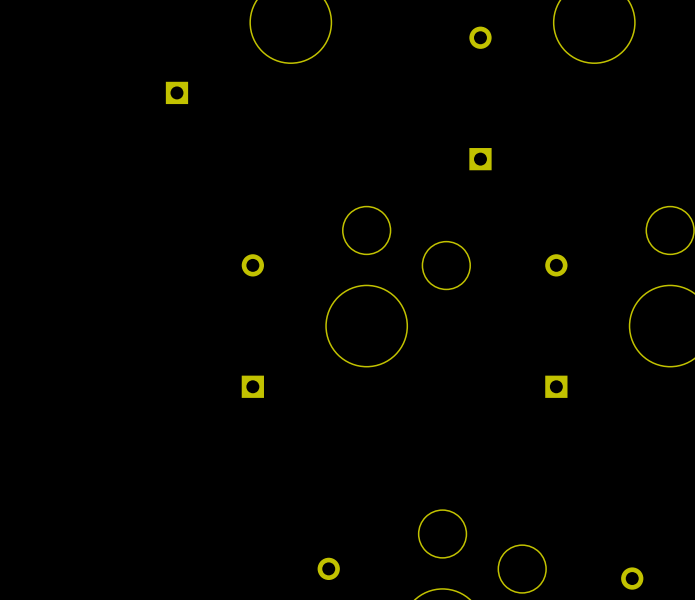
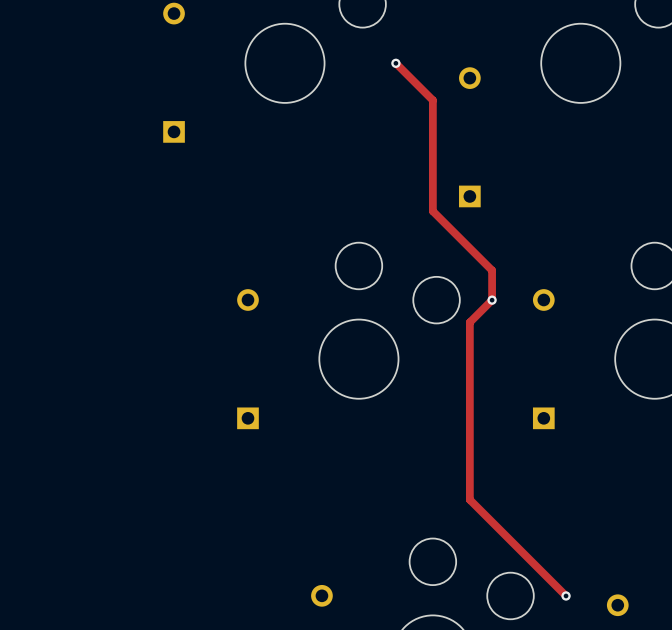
track: none -> (395, 63) (432, 100) (432, 211) (492, 270) (492, 300) (469, 322) (469, 499) (566, 595)
via: none -> (395, 63)
via: none -> (492, 300)
via: none -> (566, 595)

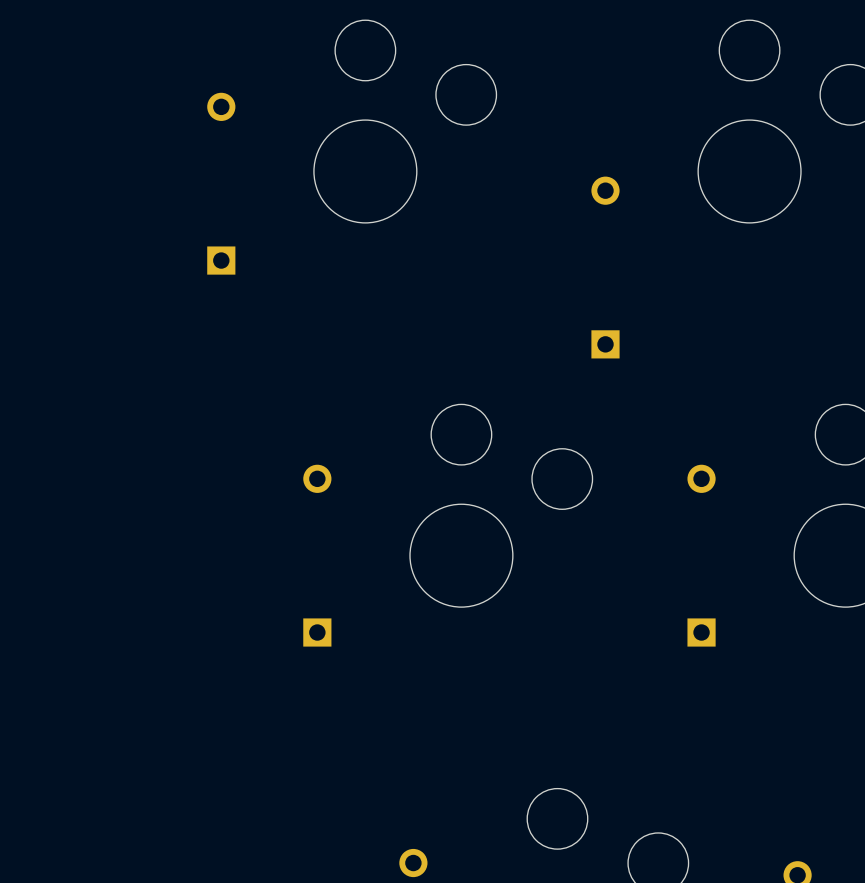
track: (395, 63) (432, 100) (432, 211) (492, 270) (492, 300) (469, 322) (469, 499) (566, 595) -> none
via: (395, 63) -> none
via: (492, 300) -> none
via: (566, 595) -> none

